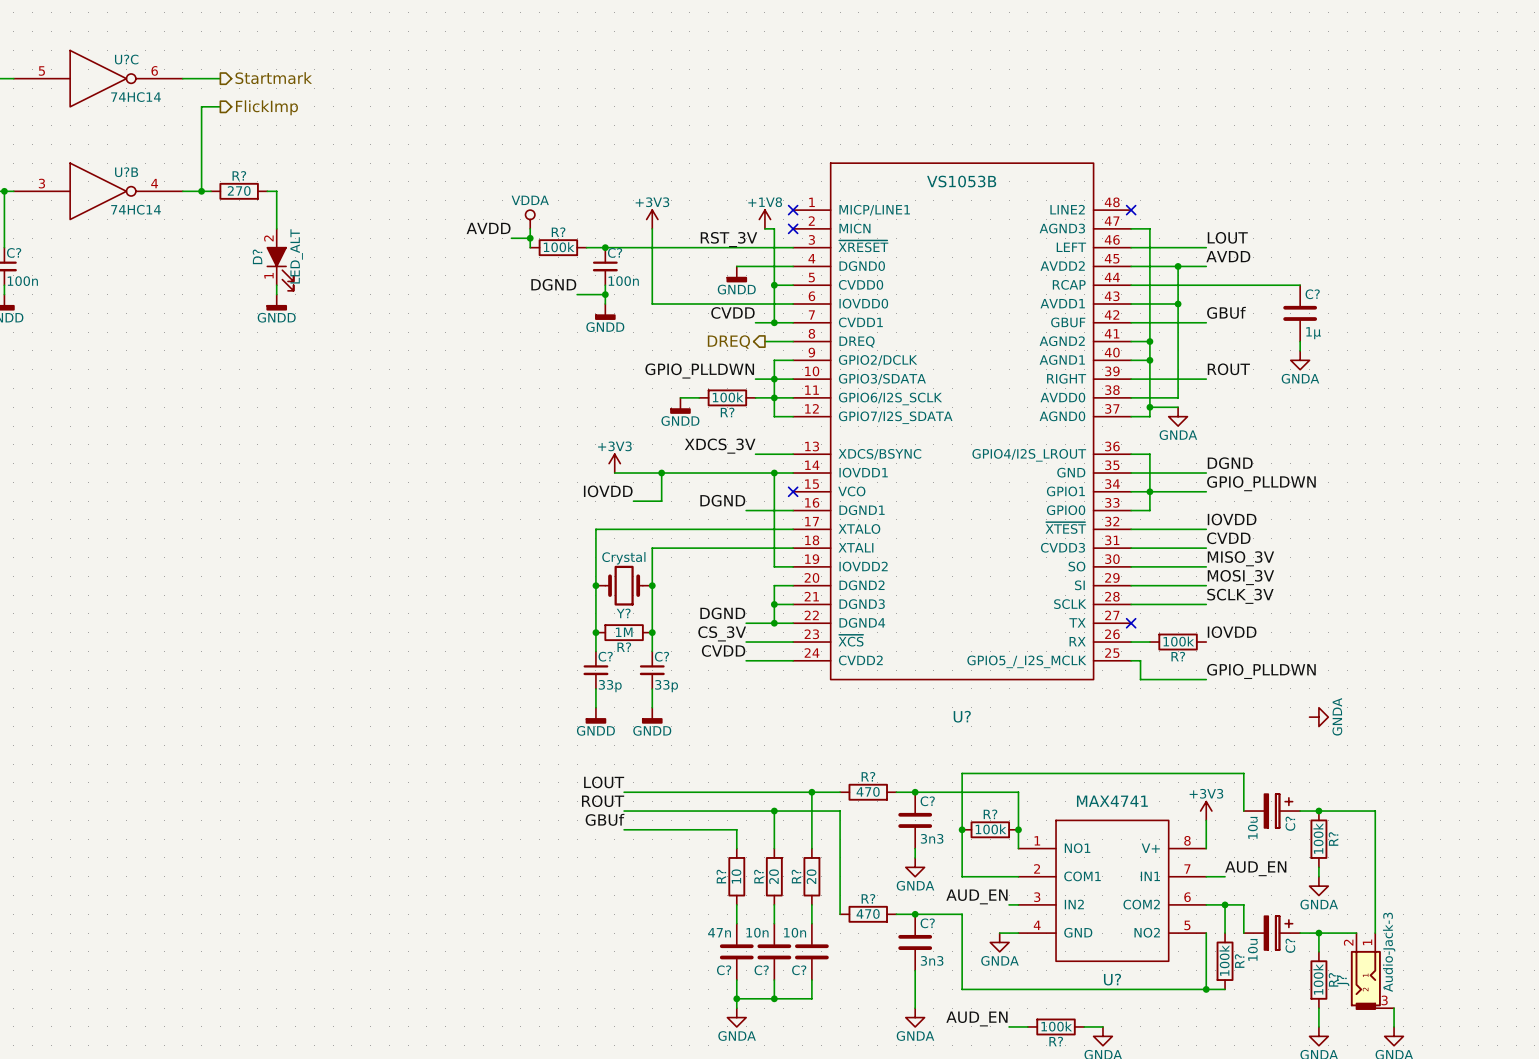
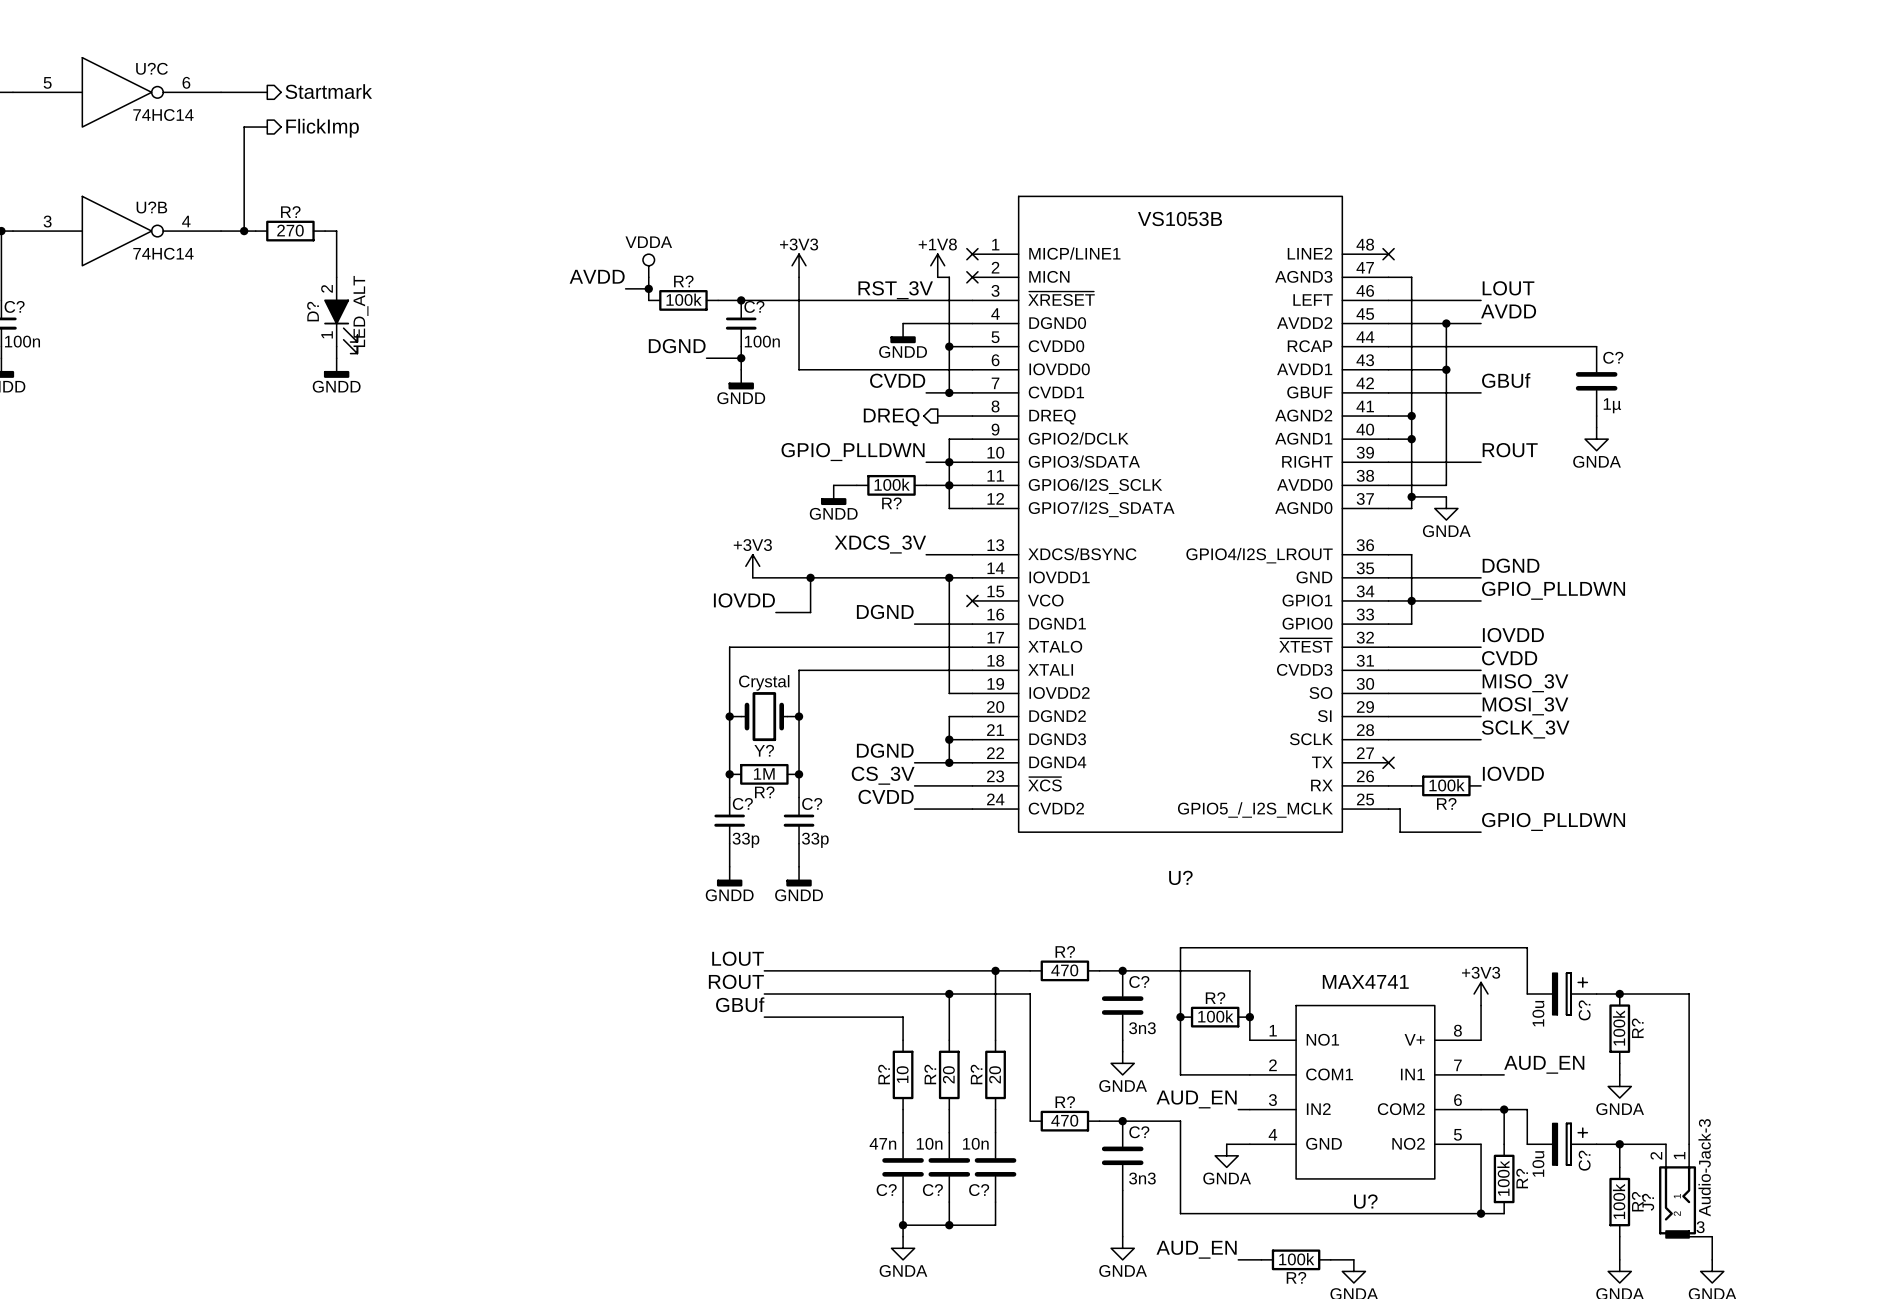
power symbol: GNDA (1318, 717) -> none

